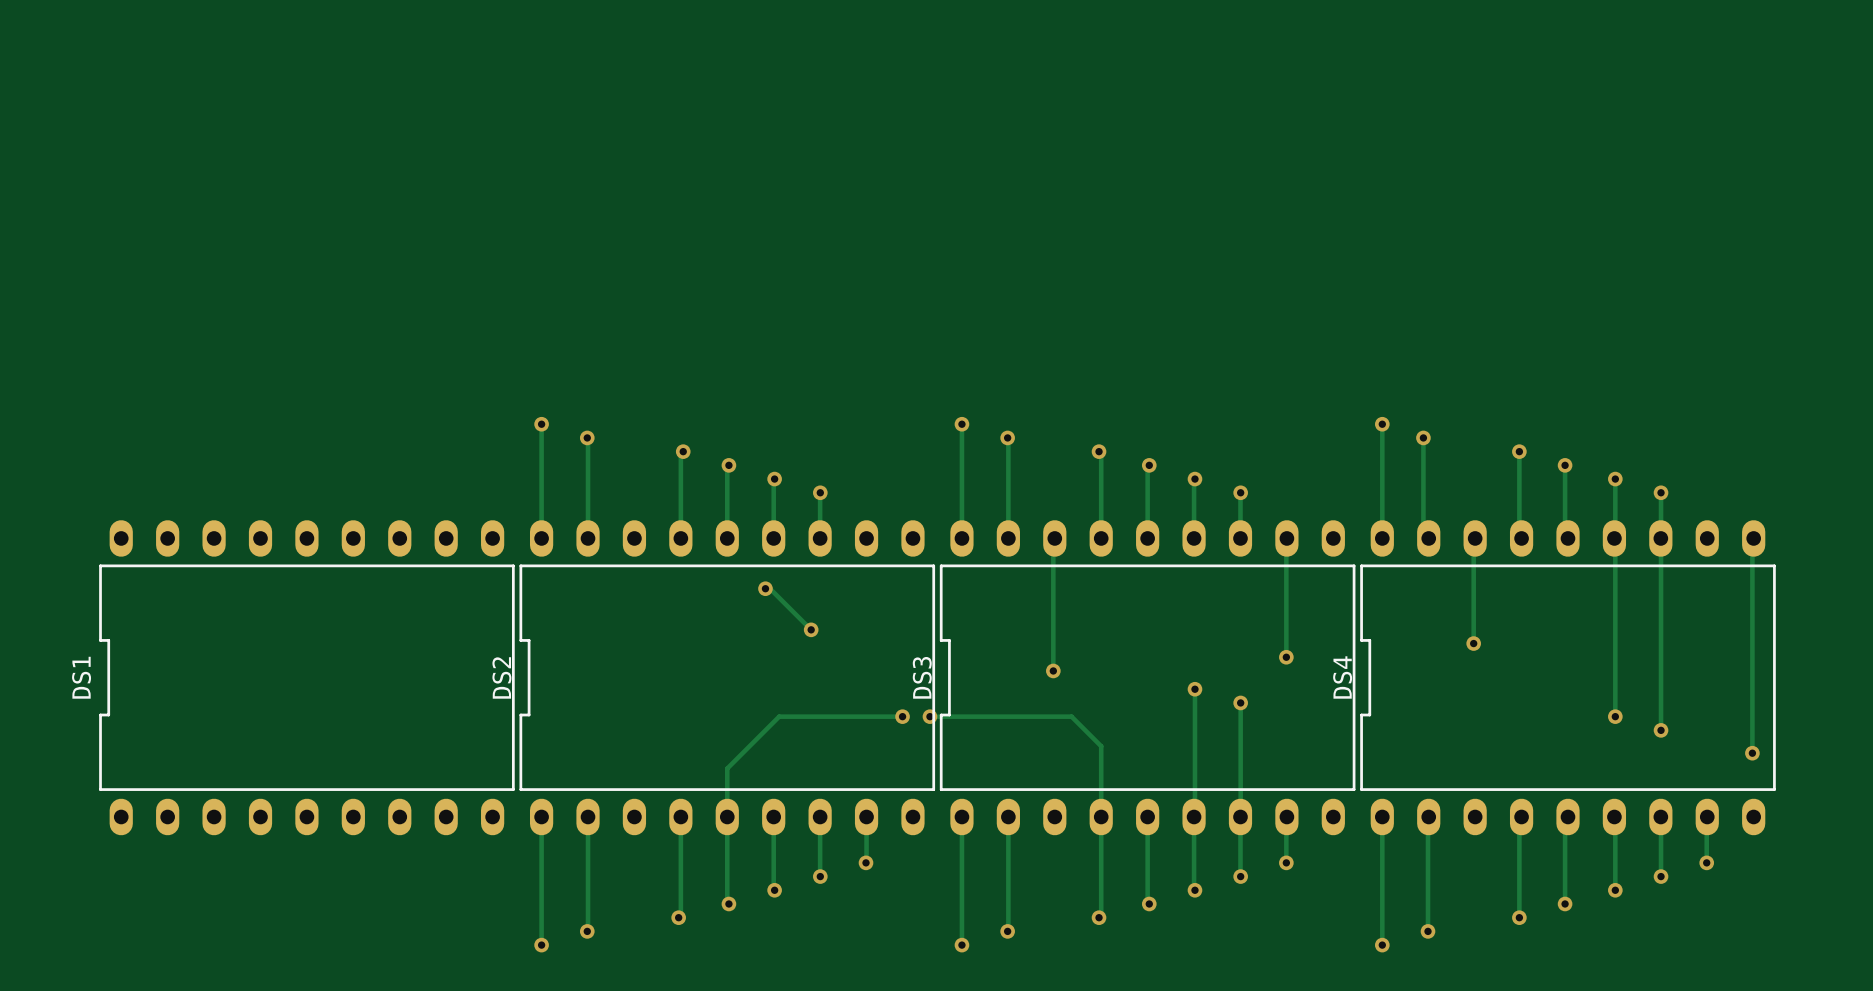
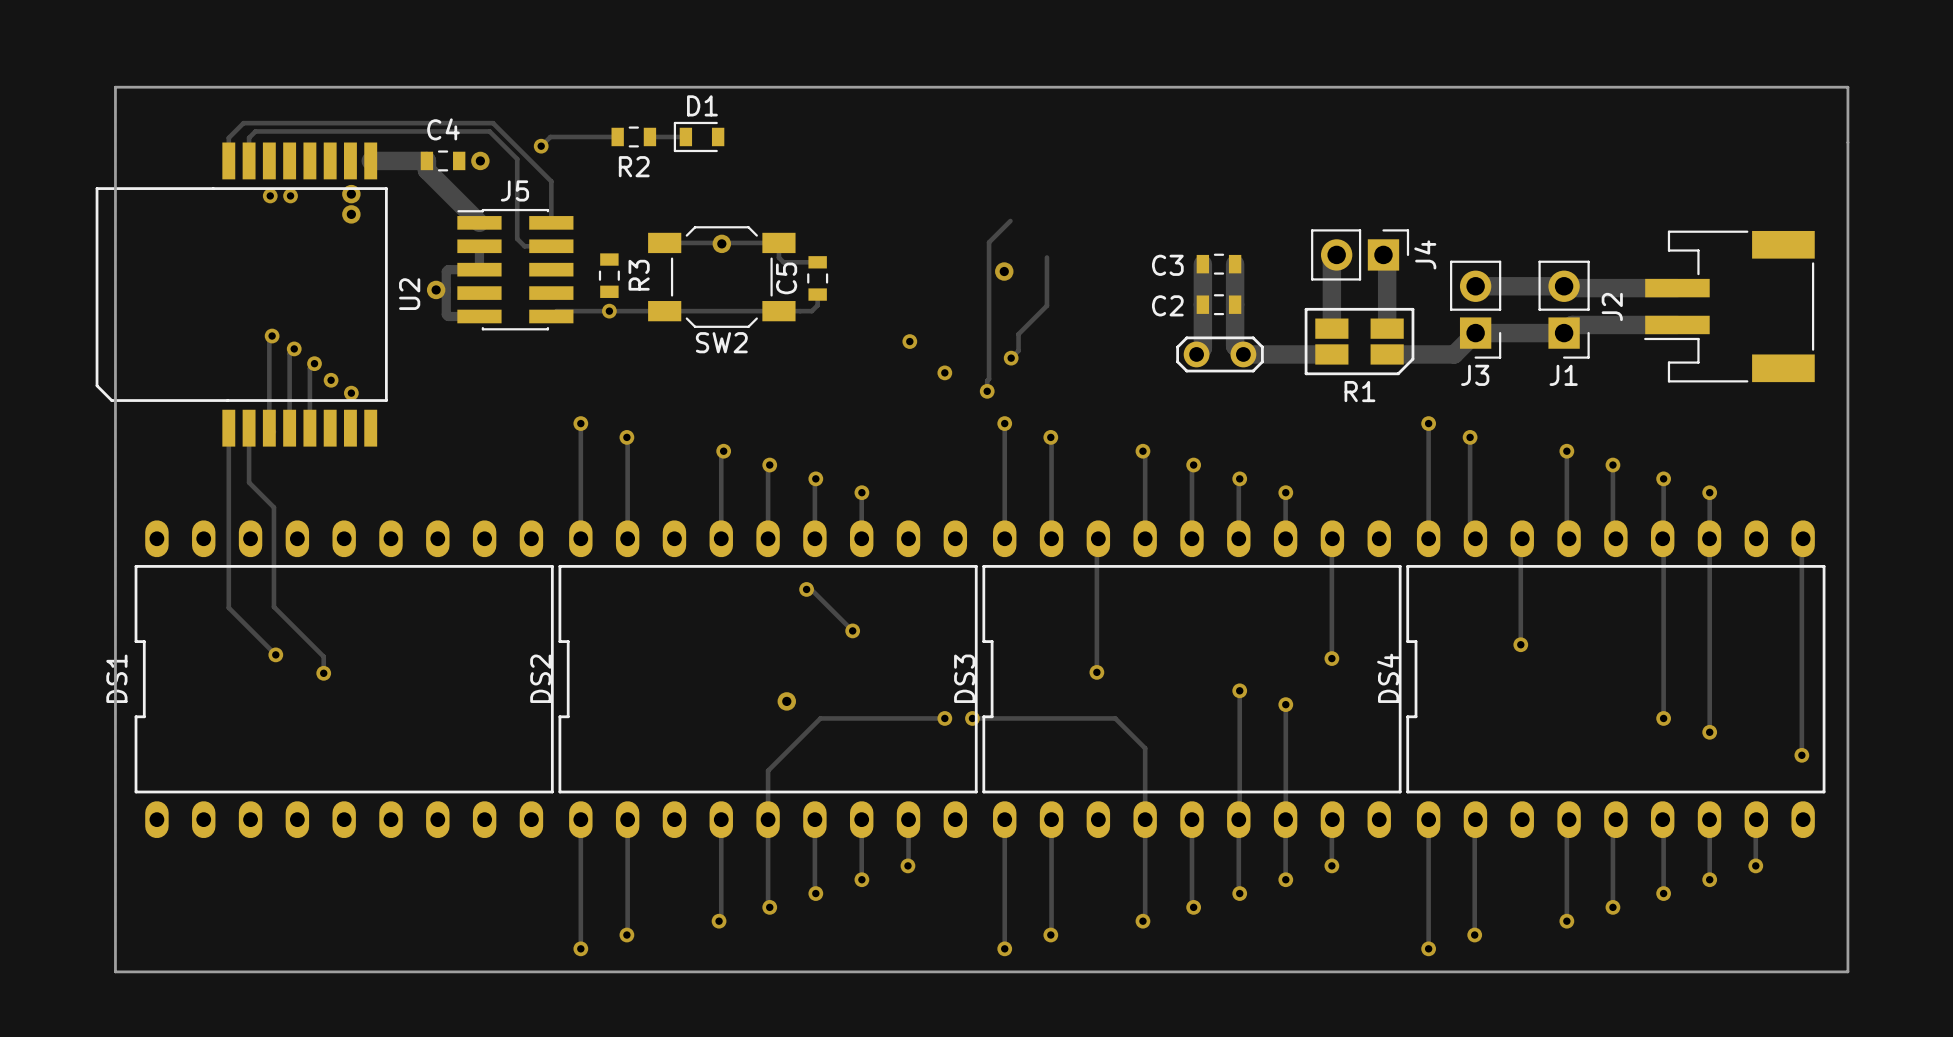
board edge: none -> (115, 87) (1847, 87) (1847, 971) (115, 971) (115, 87)
track: none -> (617, 136) (550, 136) (541, 146)
R2: none -> (633, 136)
track: none -> (649, 136) (685, 136)
D1: none -> (699, 136)
via: none -> (541, 146)
track: none -> (228, 160) (228, 137) (243, 123) (493, 123) (551, 181) (551, 222)
track: none -> (249, 160) (249, 137) (255, 131) (489, 131) (517, 159) (517, 238) (524, 246) (551, 246)
track: none -> (370, 160) (426, 160) (426, 170) (479, 222)
C4: none -> (443, 160)
via: none -> (480, 160)
via: none -> (351, 194)
via: none -> (270, 195)
via: none -> (290, 195)
via: none -> (351, 214)
track: none -> (1010, 221) (989, 242) (989, 379) (987, 380) (987, 391)
track: none -> (664, 242) (778, 242) (778, 257) (783, 262) (817, 262)
via: none -> (721, 243)
track: none -> (479, 246) (479, 269) (448, 269) (446, 271) (446, 314) (448, 316) (479, 316)
track: none -> (1336, 254) (1331, 259) (1331, 328)
J4: none -> (1360, 254)
track: none -> (1383, 254) (1387, 258) (1387, 328)
track: none -> (1046, 257) (1046, 305) (1018, 334) (1018, 350) (1011, 358)
track: none -> (1202, 264) (1202, 348) (1196, 354)
C3: none -> (1218, 264)
track: none -> (1235, 264) (1235, 346) (1243, 354) (1331, 354)
J5: none -> (515, 269)
via: none -> (1004, 271)
R3: none -> (609, 275)
SW2: none -> (721, 277)
C5: none -> (817, 278)
track: none -> (1475, 286) (1677, 288)
via: none -> (436, 289)
U2: none -> (241, 294)
track: none -> (817, 294) (817, 305) (811, 311) (556, 311) (551, 316)
C2: none -> (1218, 304)
J2: none -> (1729, 306)
J3: none -> (1475, 309)
J1: none -> (1564, 309)
via: none -> (609, 311)
track: none -> (1677, 324) (1572, 324) (1564, 333) (1475, 333) (1454, 354) (1387, 354)
track: none -> (272, 336) (269, 338) (269, 428)
via: none -> (272, 336)
via: none -> (909, 341)
R1: none -> (1359, 341)
track: none -> (294, 348) (289, 353) (289, 428)
via: none -> (294, 348)
part: none -> (1220, 354)
via: none -> (1011, 358)
track: none -> (314, 363) (309, 368) (309, 428)
via: none -> (314, 363)
via: none -> (944, 372)
via: none -> (331, 380)
via: none -> (987, 391)
via: none -> (351, 393)
track: none -> (228, 428) (228, 607) (275, 654)
track: none -> (249, 428) (249, 482) (273, 507) (273, 606) (323, 656) (323, 673) (321, 671)
via: none -> (275, 654)
via: none -> (323, 673)
via: none -> (786, 701)

